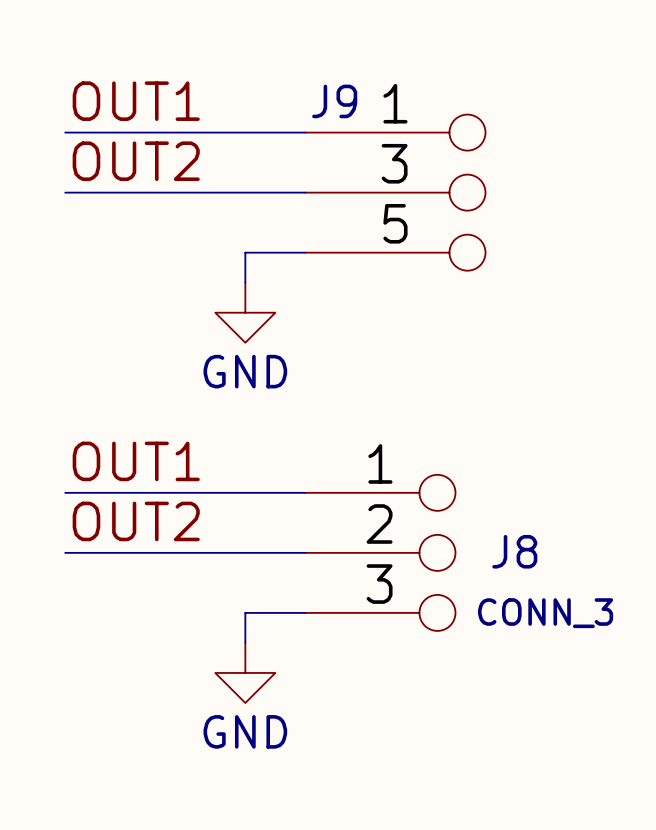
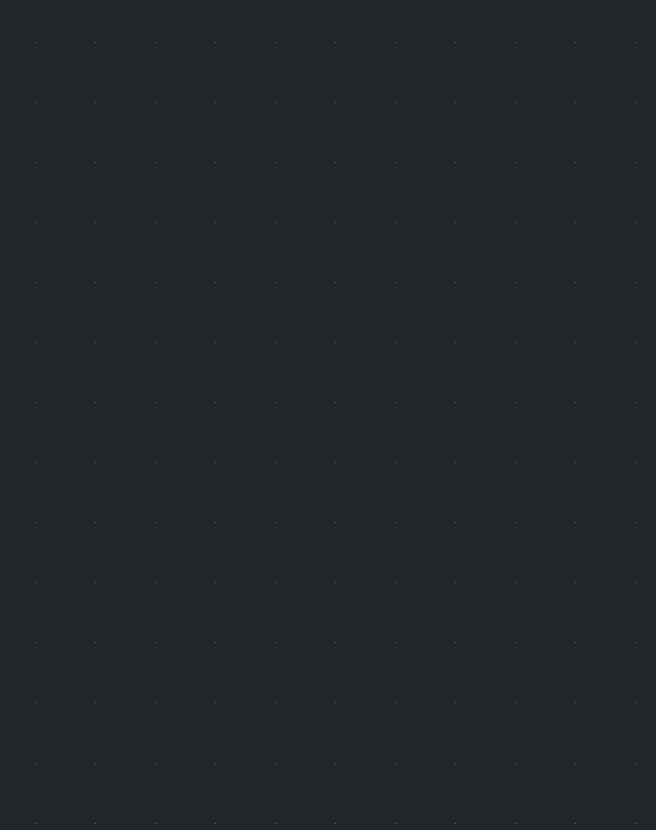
label: OUT1 (136, 101) -> none
wire: (65, 132) (305, 132) -> none
label: OUT2 (136, 161) -> none
wire: (65, 192) (305, 192) -> none
J9: (395, 192) -> none
wire: (305, 252) (245, 252) (245, 282) -> none
power symbol: GND (245, 312) -> none
label: OUT1 (136, 461) -> none
wire: (65, 492) (305, 492) -> none
label: OUT2 (136, 521) -> none
wire: (65, 552) (305, 552) -> none
J8: CONN_3 (380, 552) -> none
wire: (305, 612) (245, 612) (245, 642) -> none
power symbol: GND (245, 672) -> none

